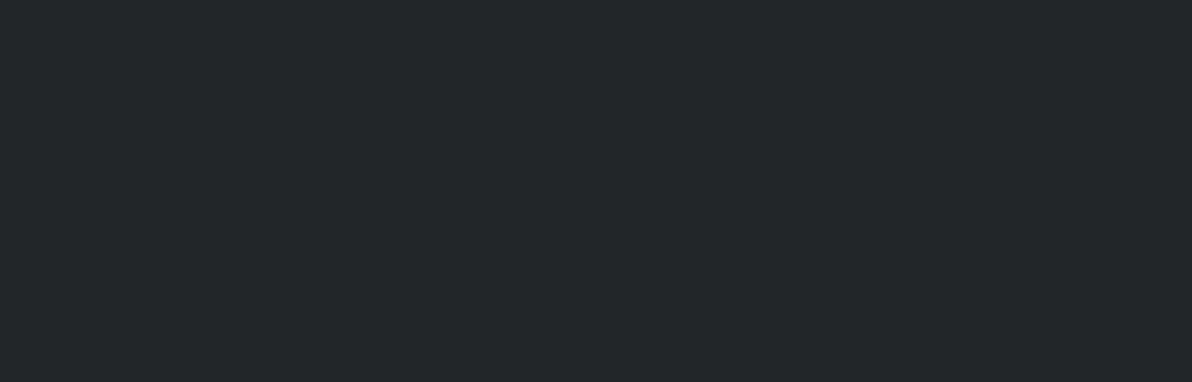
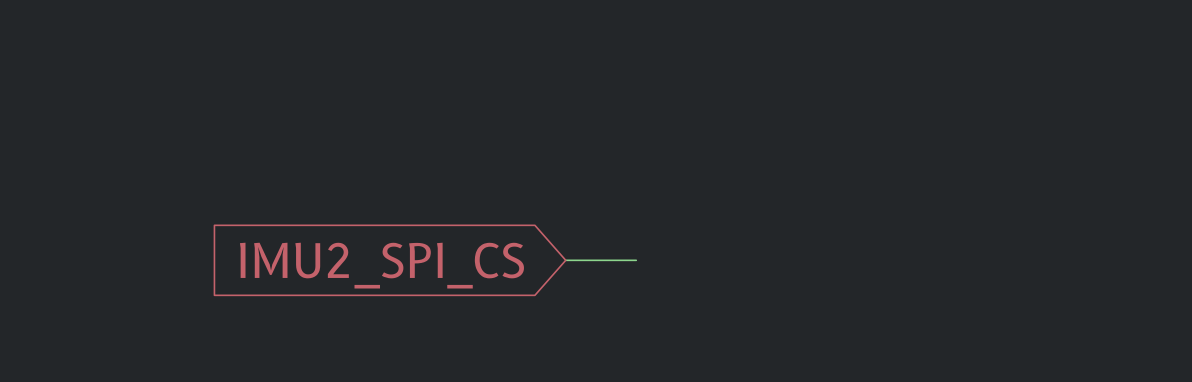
wire: none -> (565, 260) (636, 260)
global label: none -> IMU2_SPI_CS (381, 265)

